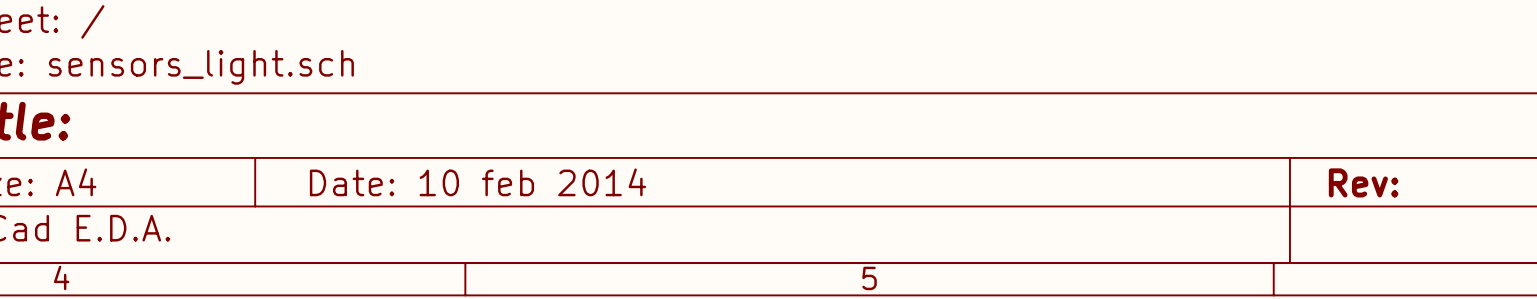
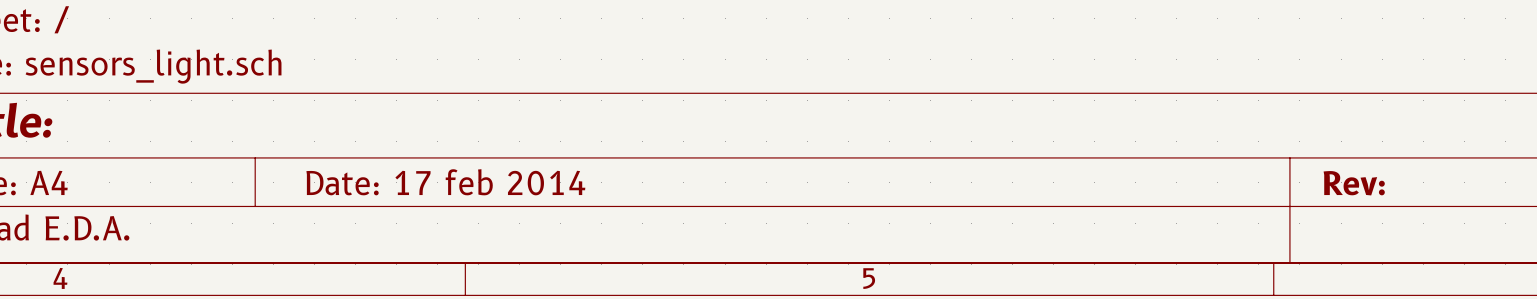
title block: Date: 10 feb 2014 (477, 182) -> Date: 17 feb 2014 (445, 182)

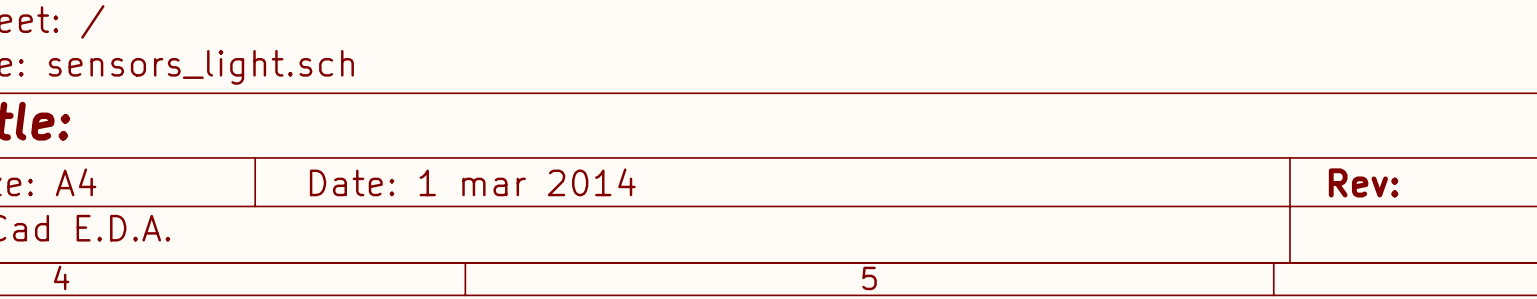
title block: Date: 17 feb 2014 (445, 182) -> Date: 1 mar 2014 (472, 182)

